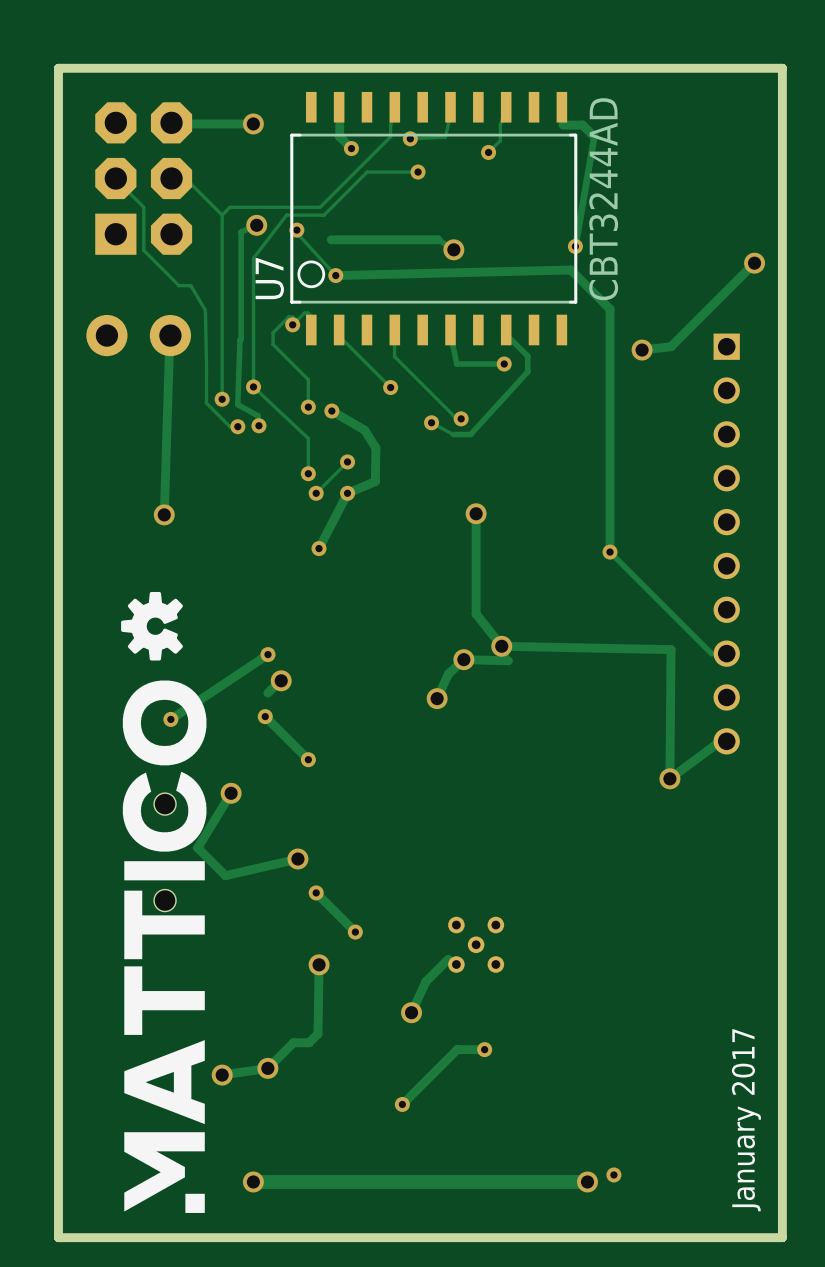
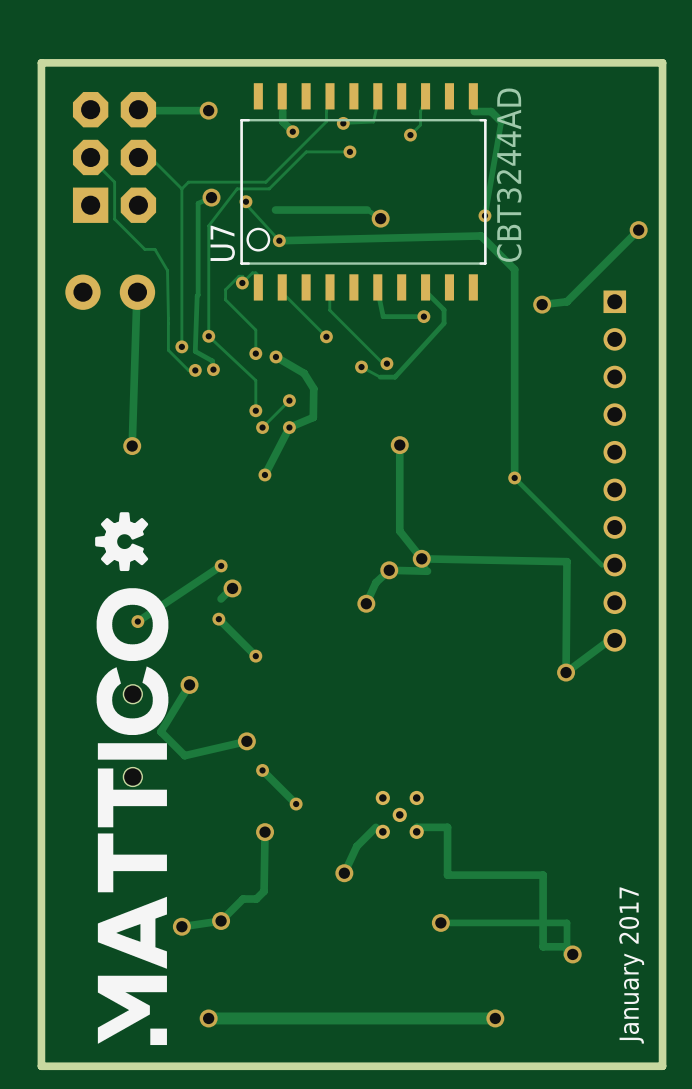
track: none -> (416, 831) (416, 827) (447, 827) (447, 875) (543, 875) (543, 946) (567, 946)
track: (484, 1049) (457, 1049) (402, 1104) -> none
via: (484, 1049) -> none
track: none -> (440, 922) (567, 922) (567, 946)
via: none -> (440, 922)
via: (402, 1104) -> none
via: none -> (572, 954)
via: (613, 1174) -> none

